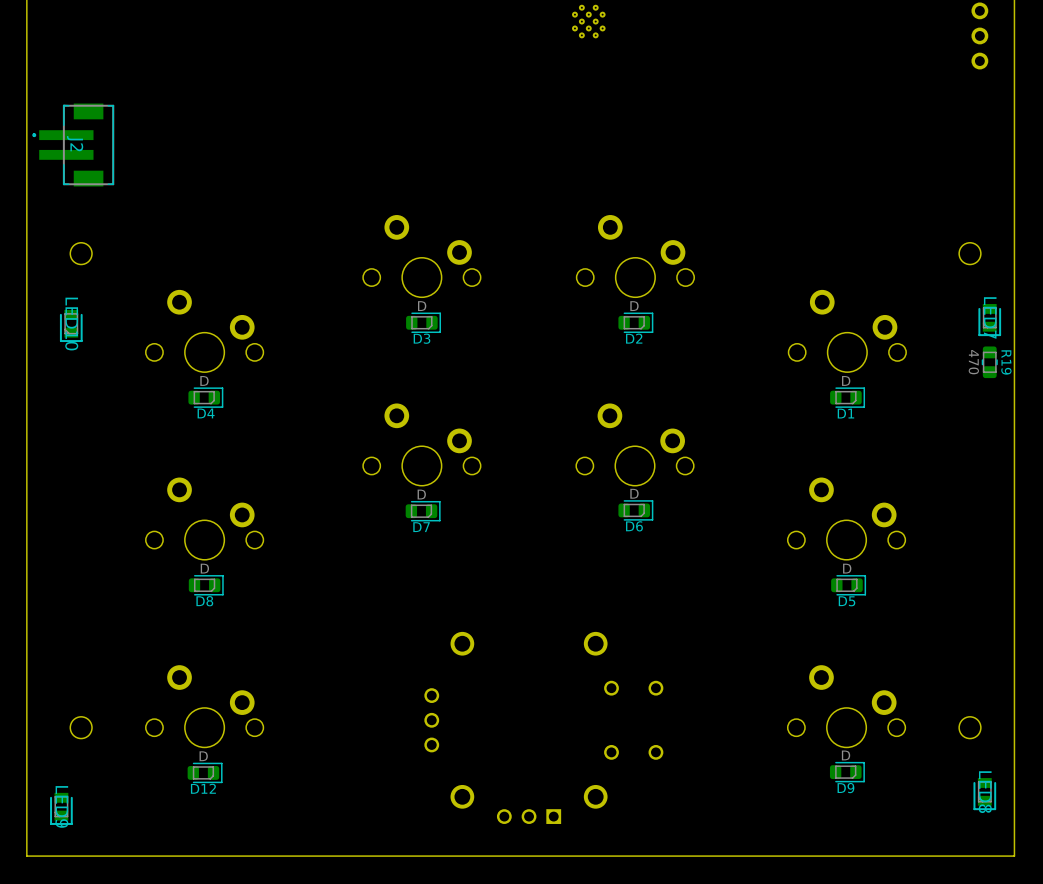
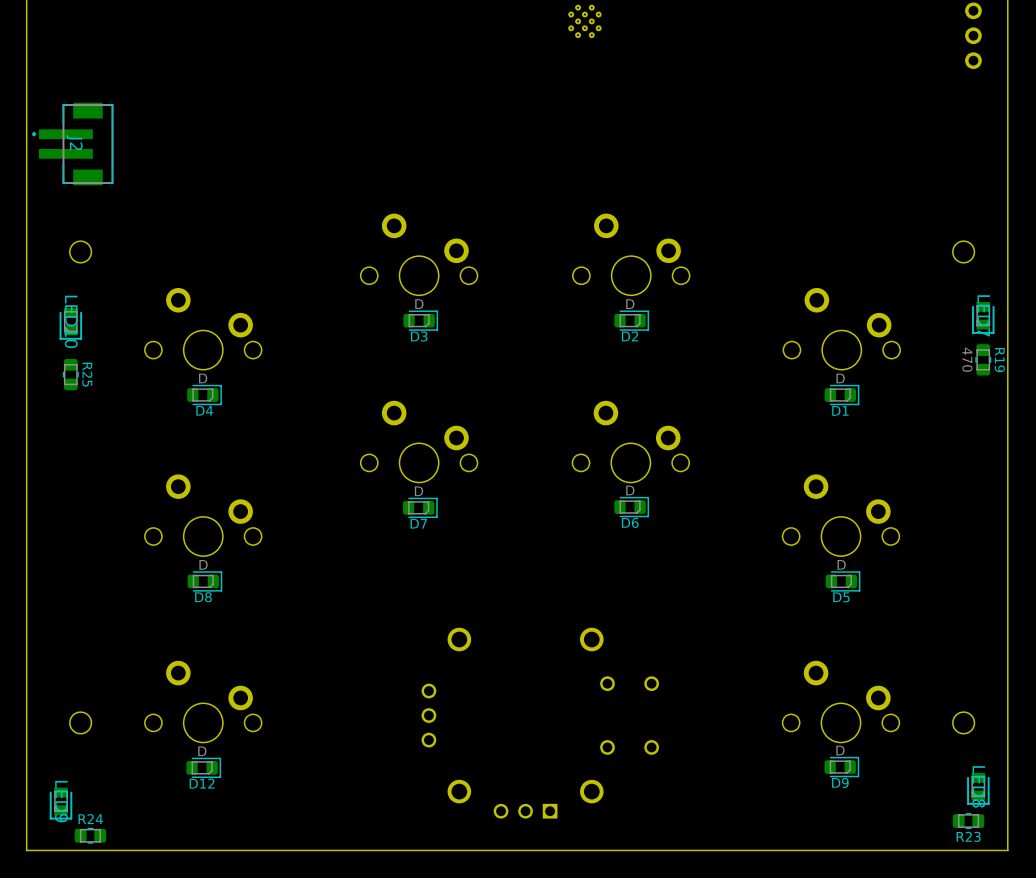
R25: none -> (70, 374)
R23: none -> (968, 821)
R24: none -> (90, 835)

